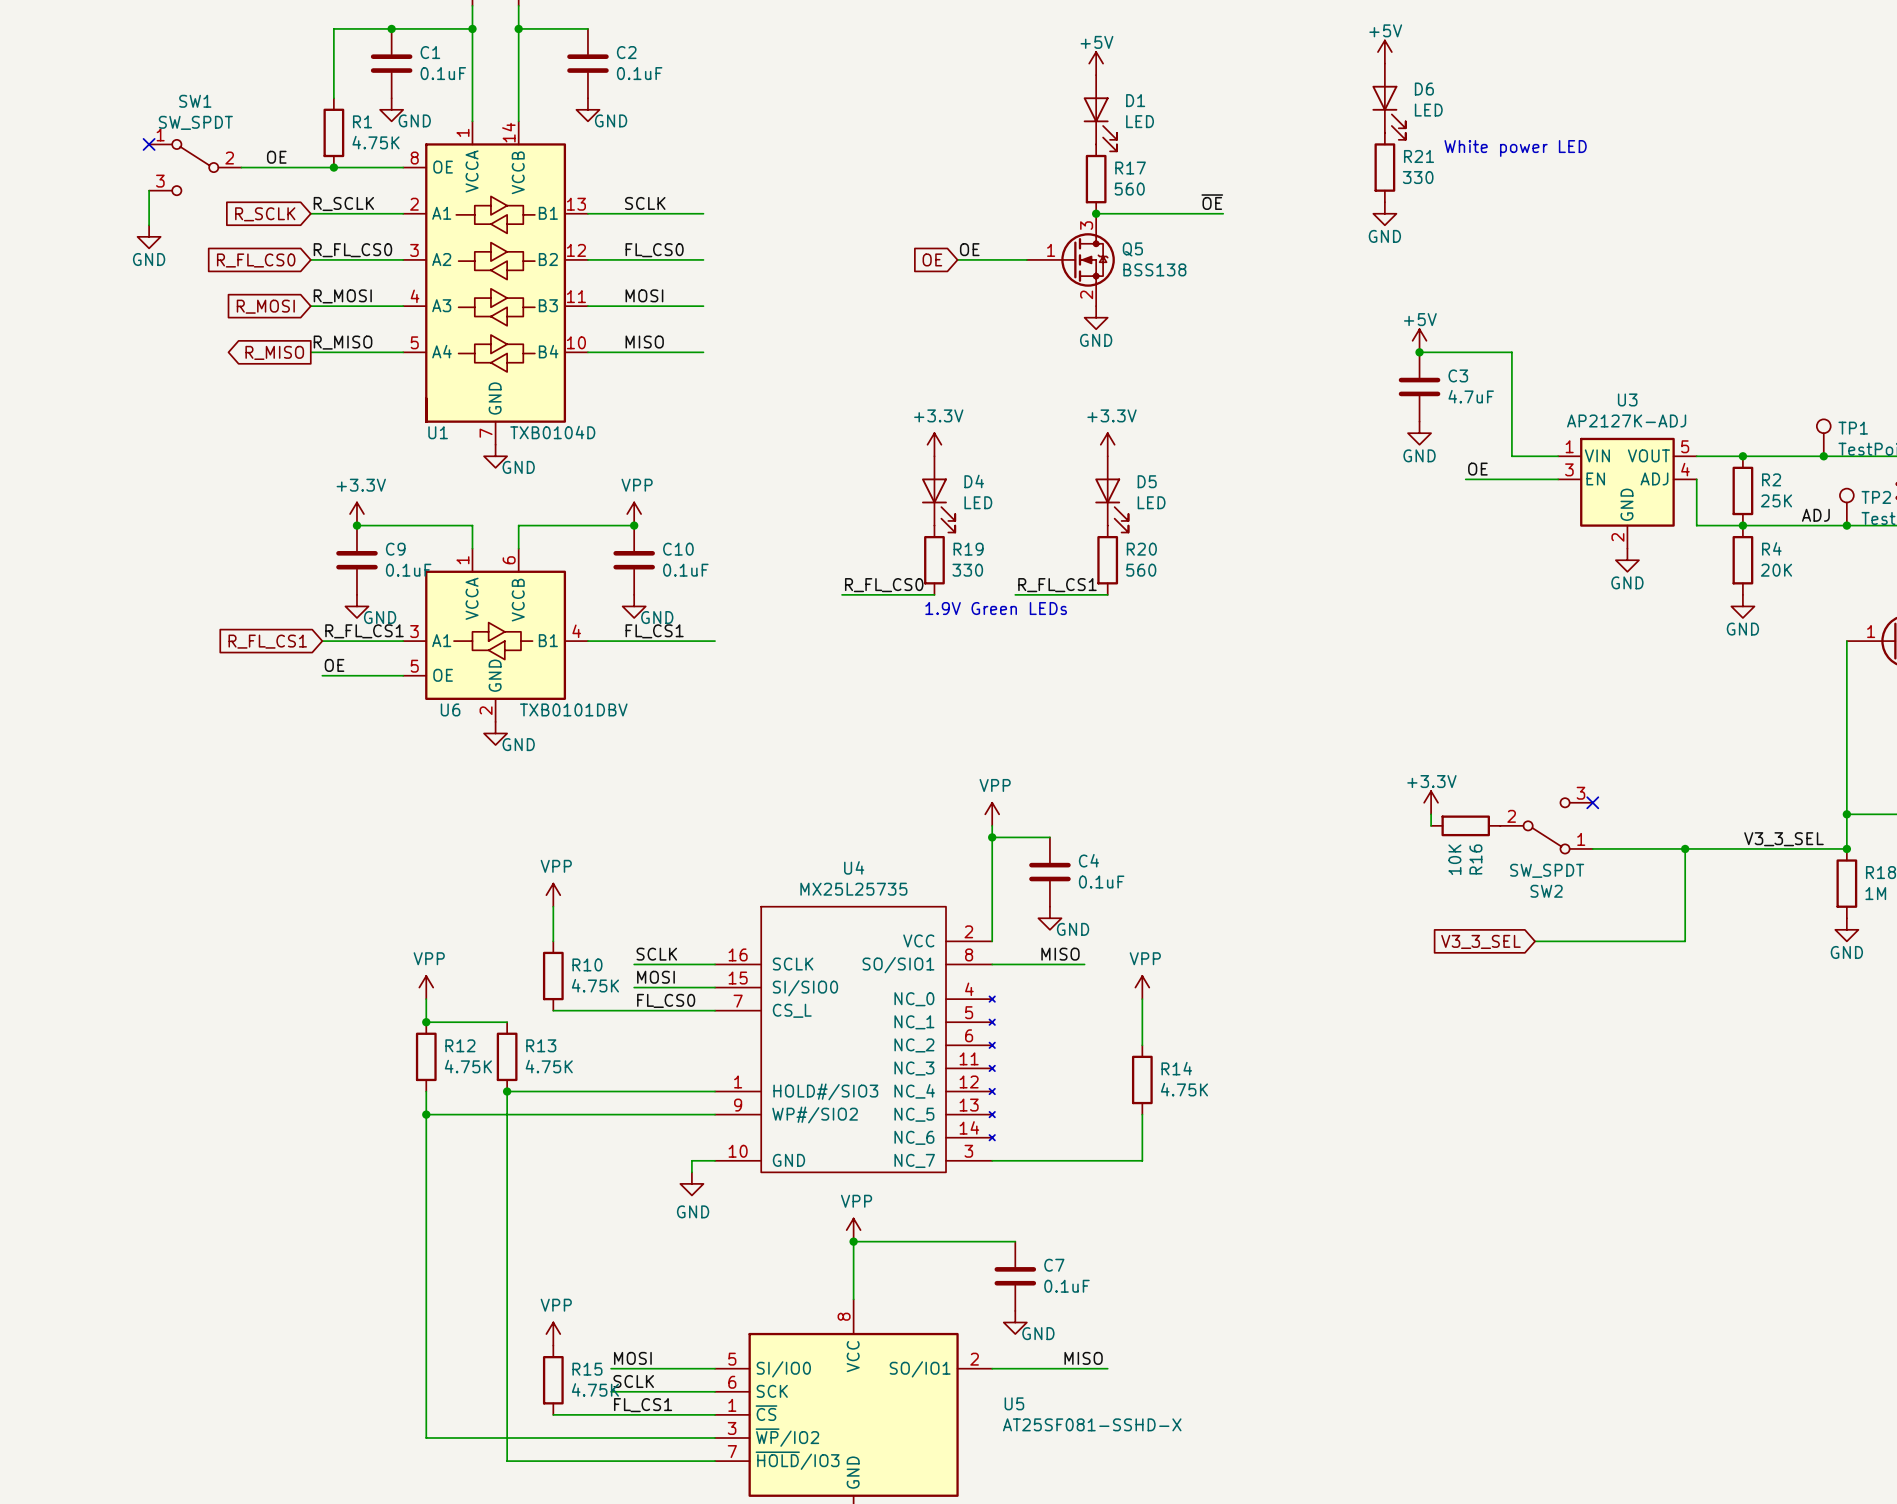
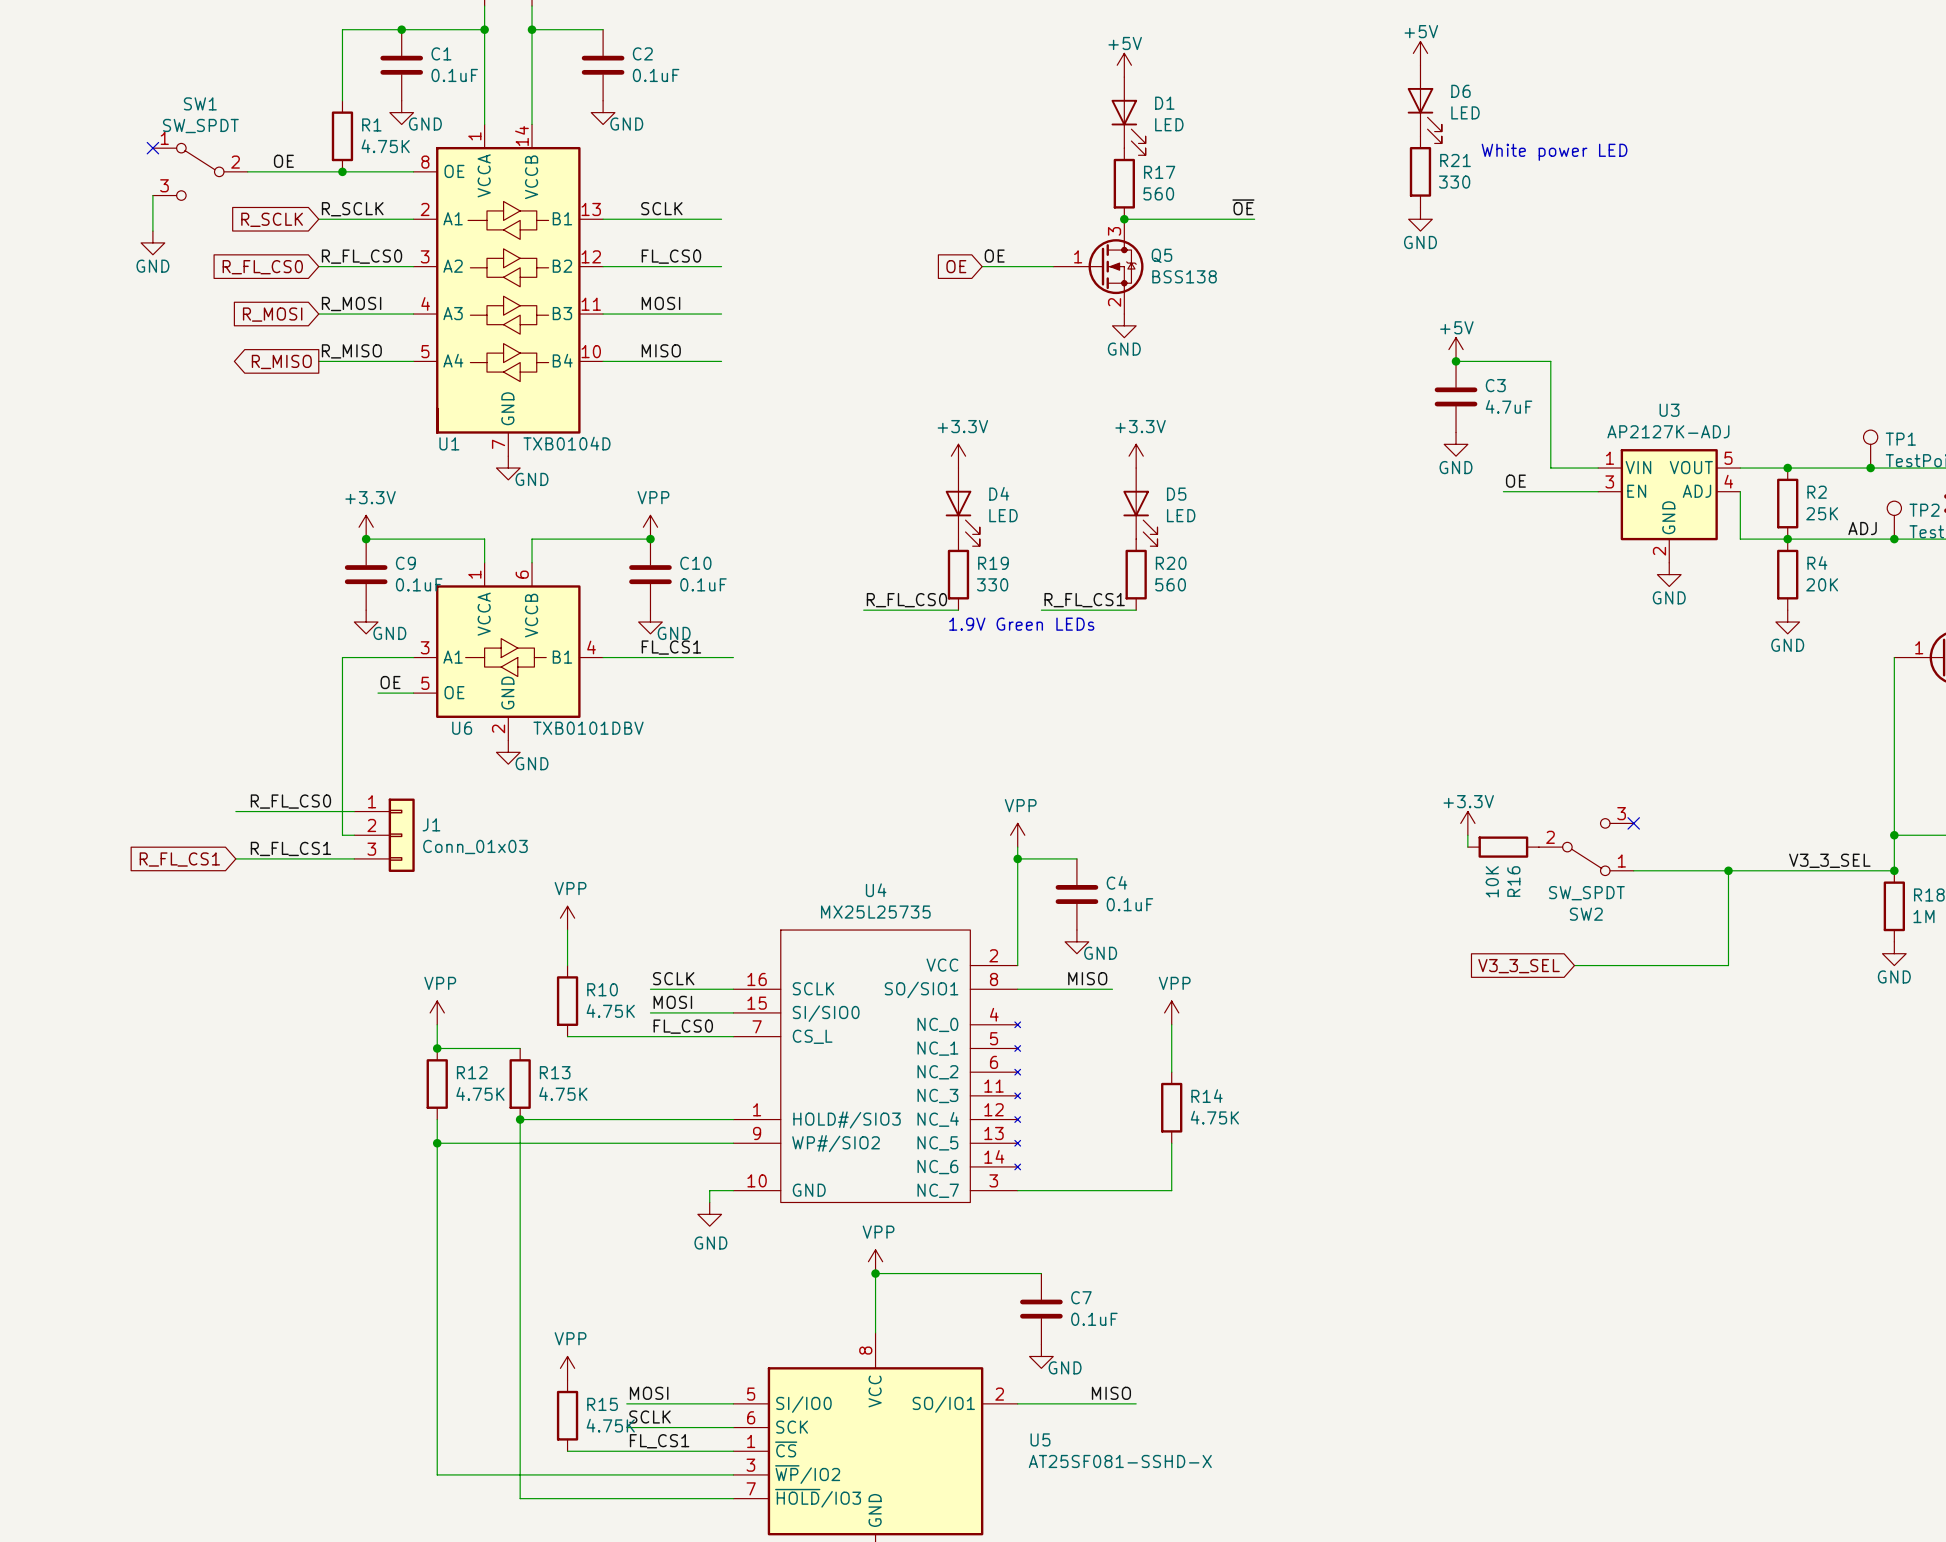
label position: R_FL_CS1 (364, 631) -> R_FL_CS1 (290, 848)
global label position: R_FL_CS1 (267, 641) -> R_FL_CS1 (179, 859)
wire: (322, 641) (333, 641) -> (354, 835) (342, 835) (342, 657)
label position: OE (334, 665) -> OE (390, 682)
wire: (322, 675) (368, 675) -> none
label: none -> R_FL_CS0 (290, 801)
wire: none -> (235, 811) (354, 811)
J1: none -> Conn_01x03 (384, 835)
wire: none -> (235, 858) (354, 858)

